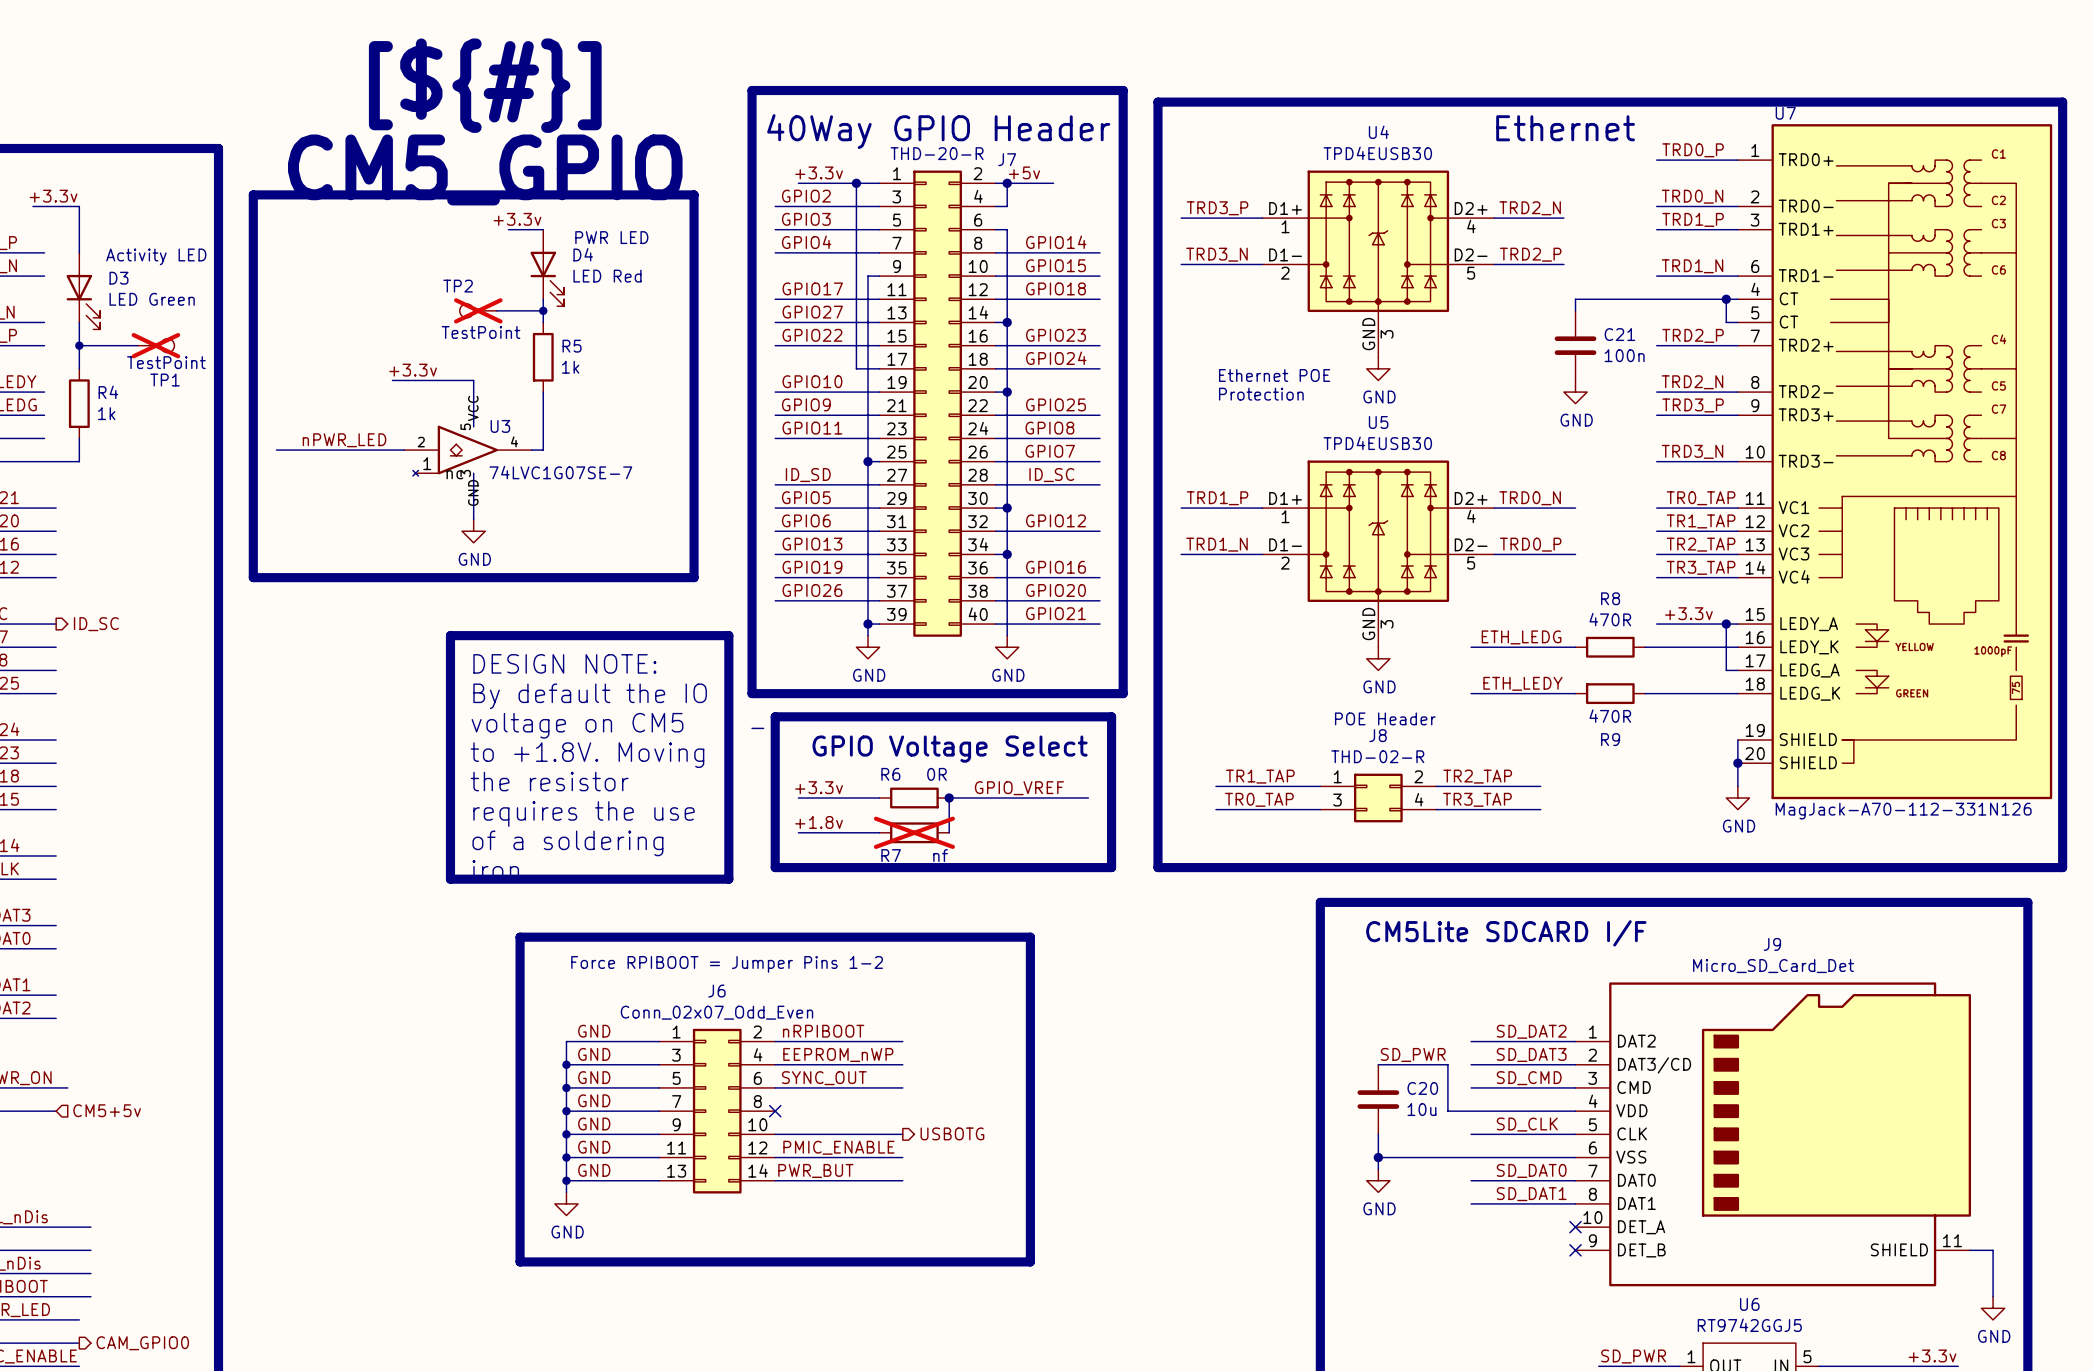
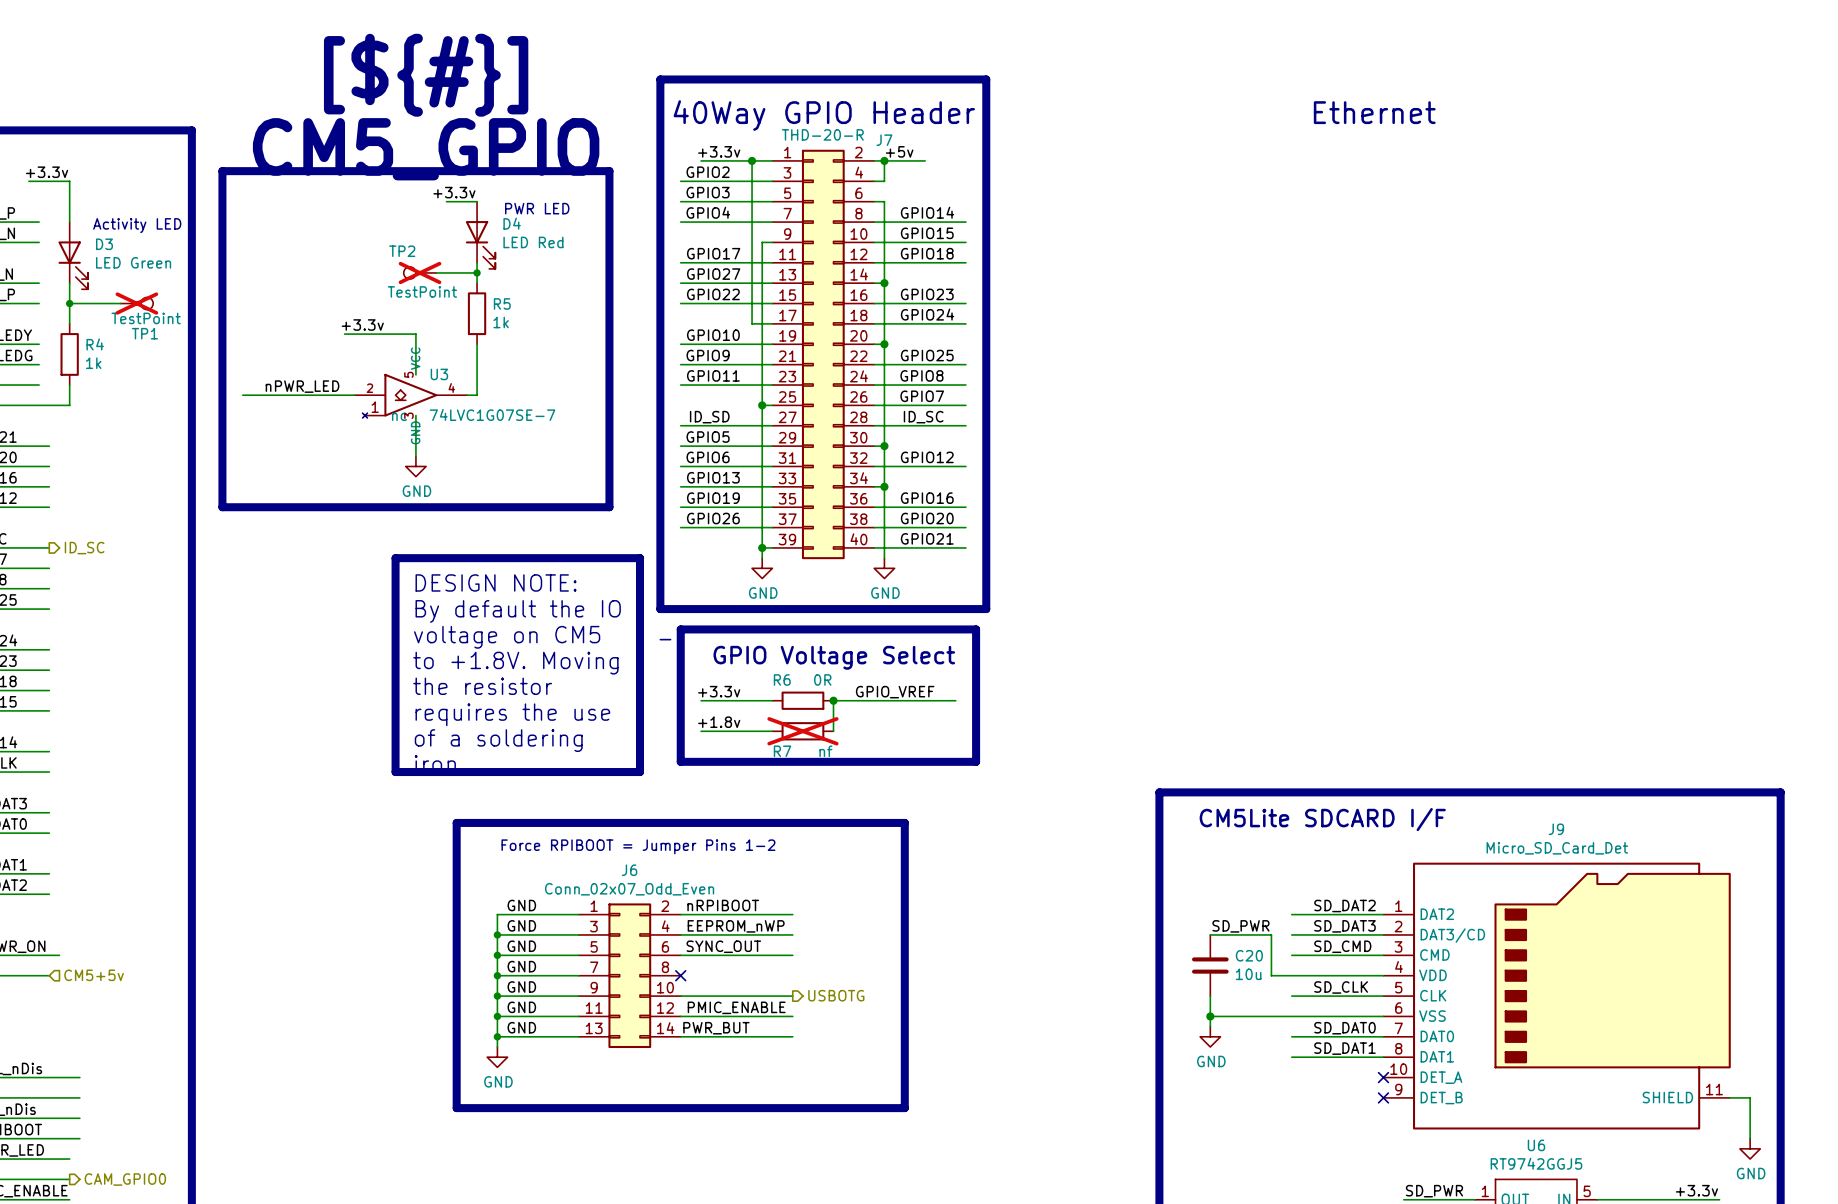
line: (1157, 102) (2062, 102) (2062, 867) (1157, 867) (1157, 102) -> none
label: TRD0_P (1693, 150) -> none
wire: (1656, 160) (1737, 160) -> none
label: TRD0_N (1692, 196) -> none
wire: (1656, 206) (1737, 206) -> none
label: TRD3_P (1217, 208) -> none
label: TRD2_N (1530, 208) -> none
wire: (1181, 218) (1262, 218) -> none
wire: (1494, 218) (1563, 218) -> none
label: TRD1_P (1693, 219) -> none
wire: (1656, 229) (1737, 229) -> none
label: TRD3_N (1216, 254) -> none
label: TRD2_P (1530, 254) -> none
U4: TPD4EUSB30 (1378, 263) -> none
wire: (1181, 264) (1262, 264) -> none
wire: (1494, 264) (1563, 264) -> none
label: TRD1_N (1692, 266) -> none
wire: (1656, 276) (1737, 276) -> none
wire: (1726, 299) (1726, 322) (1737, 322) -> none
junction: (1726, 299) -> none
wire: (1737, 299) (1575, 299) (1575, 310) -> none
label: TRD2_P (1693, 335) -> none
C21: 100n (1575, 345) -> none
wire: (1656, 345) (1737, 345) -> none
power symbol: GND (1378, 368) -> none
text: Ethernet POE (1274, 375) -> none
label: TRD2_N (1692, 382) -> none
power symbol: GND (1575, 392) -> none
wire: (1656, 392) (1737, 392) -> none
text: Protection (1261, 394) -> none
label: TRD3_P (1693, 405) -> none
wire: (1656, 415) (1737, 415) -> none
label: TRD3_N (1692, 451) -> none
wire: (1656, 461) (1737, 461) -> none
U7: MagJack-A70-112-331N126 (1895, 461) -> none
label: TRD1_P (1217, 498) -> none
label: TRD0_N (1530, 498) -> none
label: TR0_TAP (1701, 498) -> none
wire: (1181, 508) (1262, 508) -> none
wire: (1494, 508) (1575, 508) -> none
wire: (1656, 508) (1737, 508) -> none
label: TR1_TAP (1701, 521) -> none
wire: (1656, 531) (1737, 531) -> none
label: TRD1_N (1216, 544) -> none
label: TRD0_P (1530, 544) -> none
label: TR2_TAP (1701, 544) -> none
U5: TPD4EUSB30 (1378, 553) -> none
wire: (1181, 554) (1262, 554) -> none
wire: (1494, 554) (1575, 554) -> none
wire: (1656, 554) (1737, 554) -> none
label: TR3_TAP (1701, 567) -> none
wire: (1656, 577) (1737, 577) -> none
label: +3.3v (1688, 613) -> none
wire: (1656, 624) (1737, 624) -> none
wire: (1726, 624) (1726, 670) (1737, 670) -> none
junction: (1726, 624) -> none
label: ETH_LEDG (1521, 637) -> none
wire: (1471, 647) (1575, 647) -> none
R8: 470R (1610, 647) -> none
wire: (1645, 647) (1737, 647) -> none
power symbol: GND (1378, 658) -> none
label: ETH_LEDY (1522, 683) -> none
wire: (1471, 693) (1575, 693) -> none
R9: 470R (1610, 693) -> none
wire: (1645, 693) (1737, 693) -> none
text: POE Header (1385, 718) -> none
wire: (1737, 740) (1737, 786) -> none
junction: (1737, 763) -> none
label: TR1_TAP (1260, 776) -> none
label: TR2_TAP (1477, 776) -> none
wire: (1215, 786) (1320, 786) -> none
wire: (1436, 786) (1540, 786) -> none
J8: THD-02-R (1378, 798) -> none
power symbol: GND (1737, 798) -> none
label: TR0_TAP (1259, 799) -> none
label: TR3_TAP (1477, 799) -> none
wire: (1215, 809) (1320, 809) -> none
wire: (1436, 809) (1540, 809) -> none

